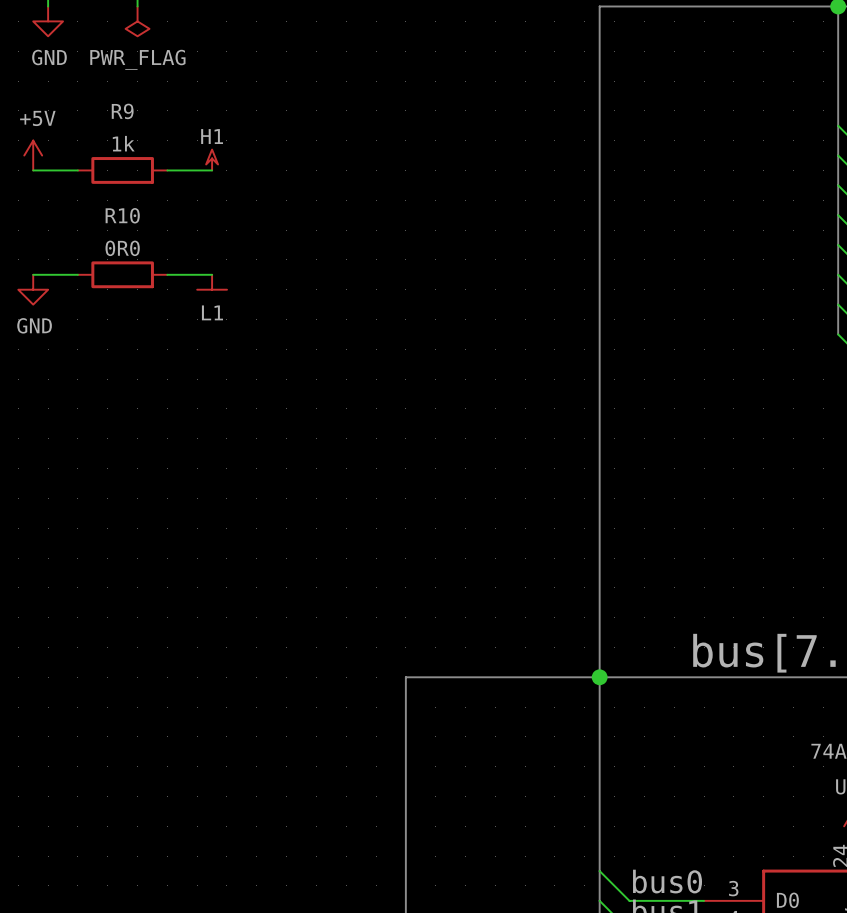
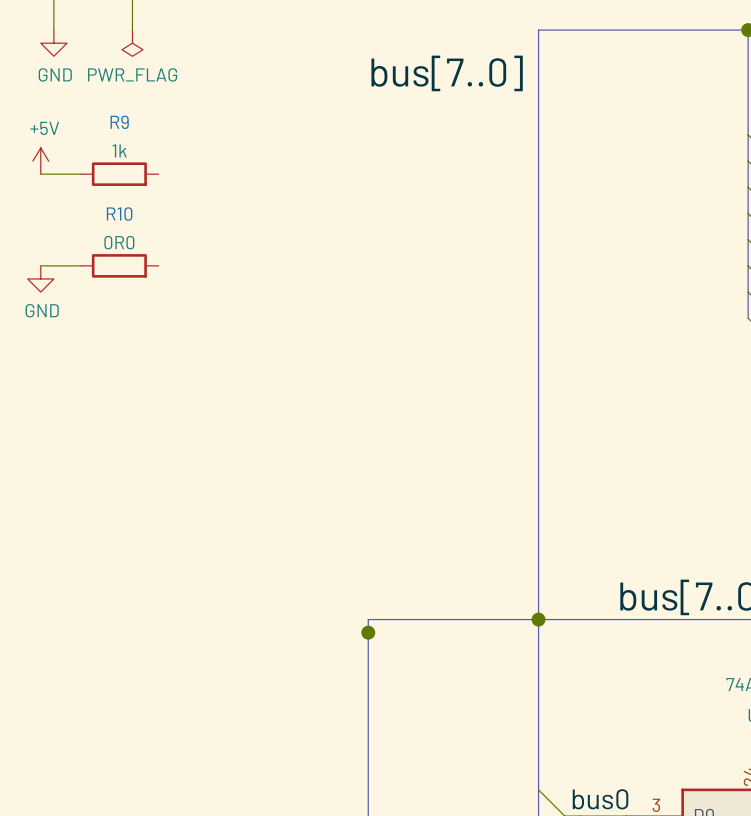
label: none -> bus[7..0] (447, 73)
power symbol: H1 (212, 160) -> none
wire: (167, 170) (212, 170) -> none
wire: (167, 274) (212, 274) -> none
power symbol: L1 (212, 282) -> none
junction: none -> (368, 632)

